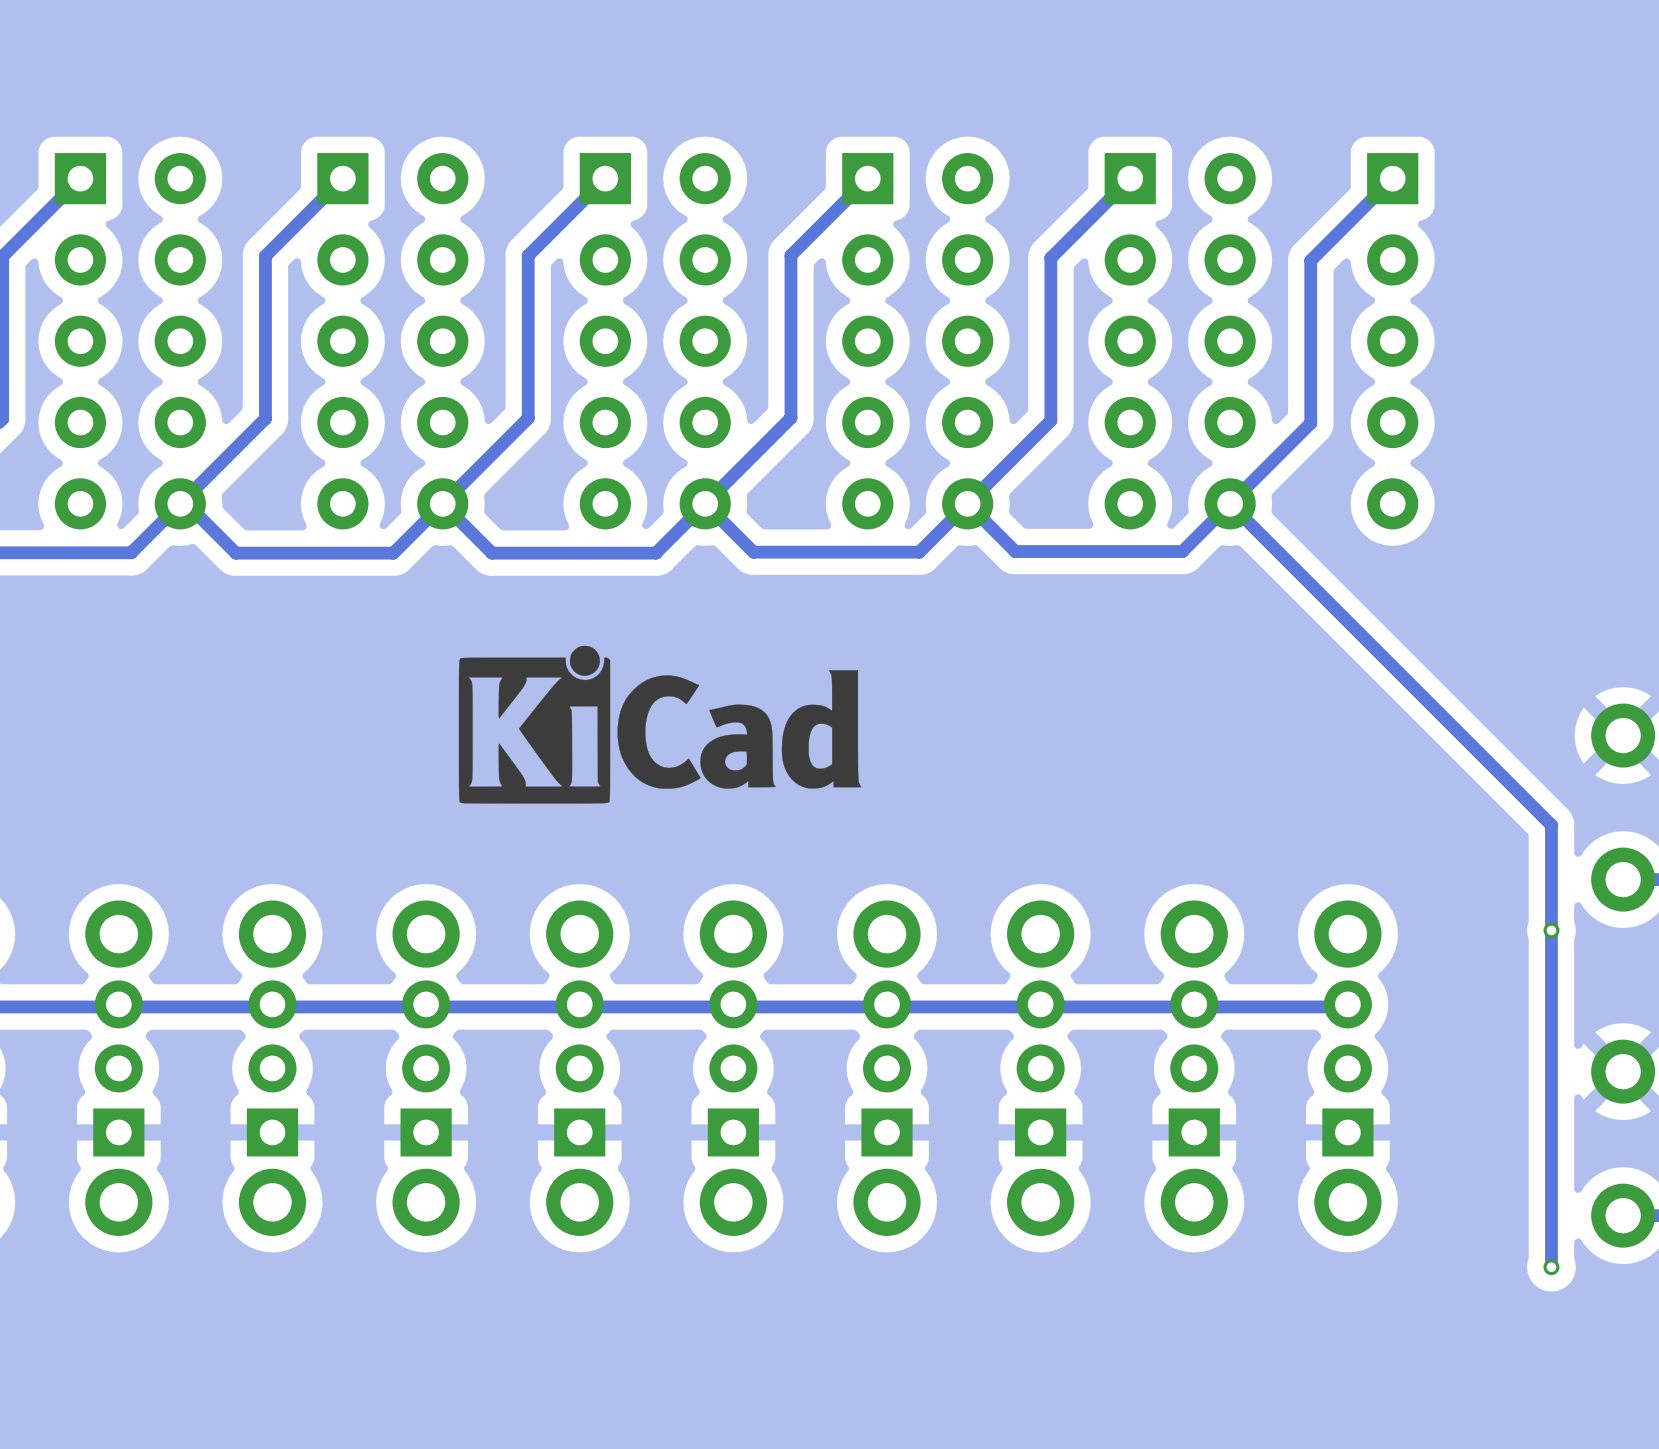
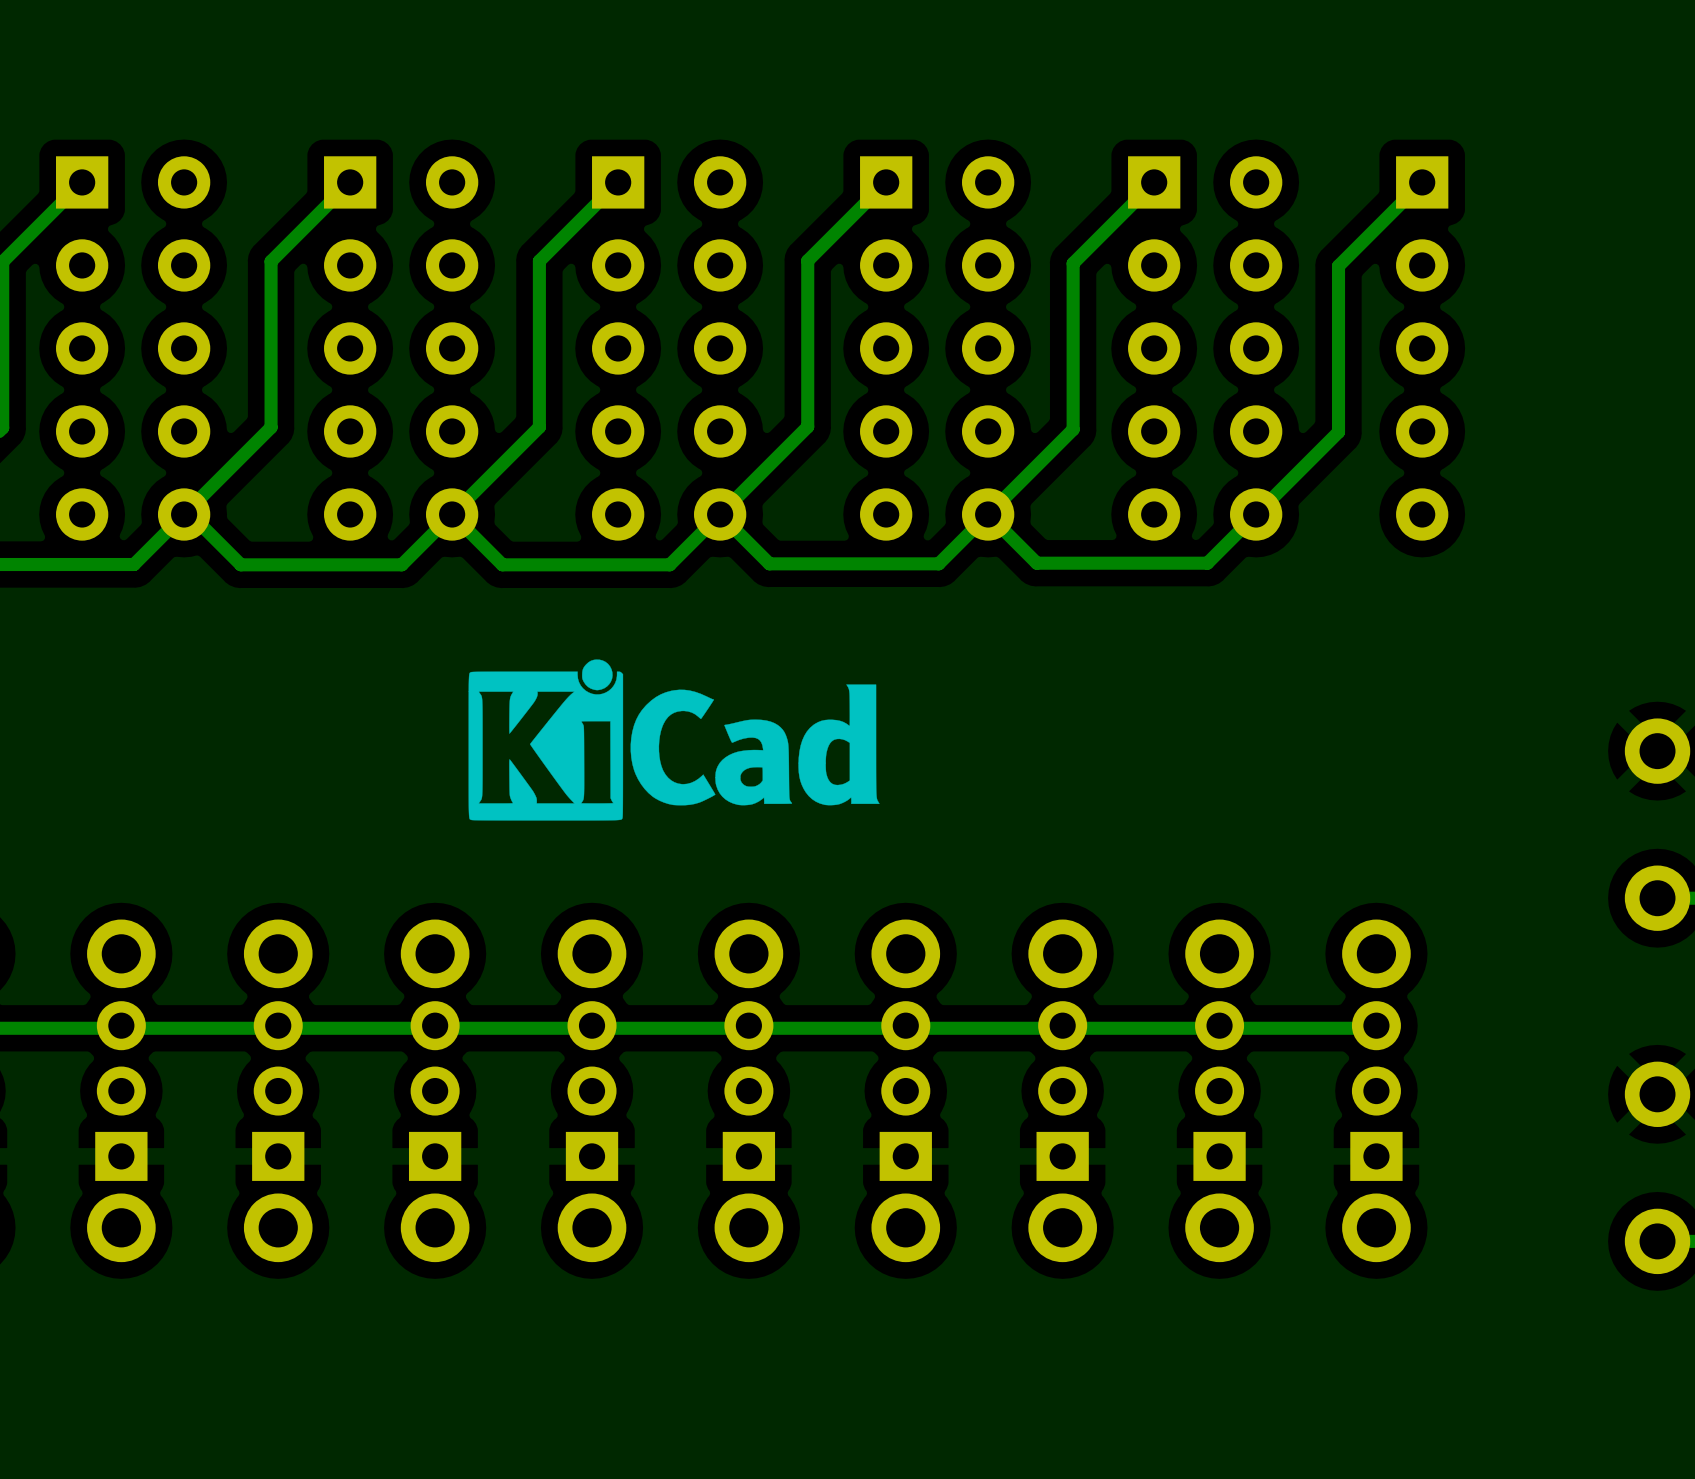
track: (1230, 503) (1551, 825) (1551, 1267) -> none
via: (1551, 930) -> none
via: (1551, 1267) -> none

